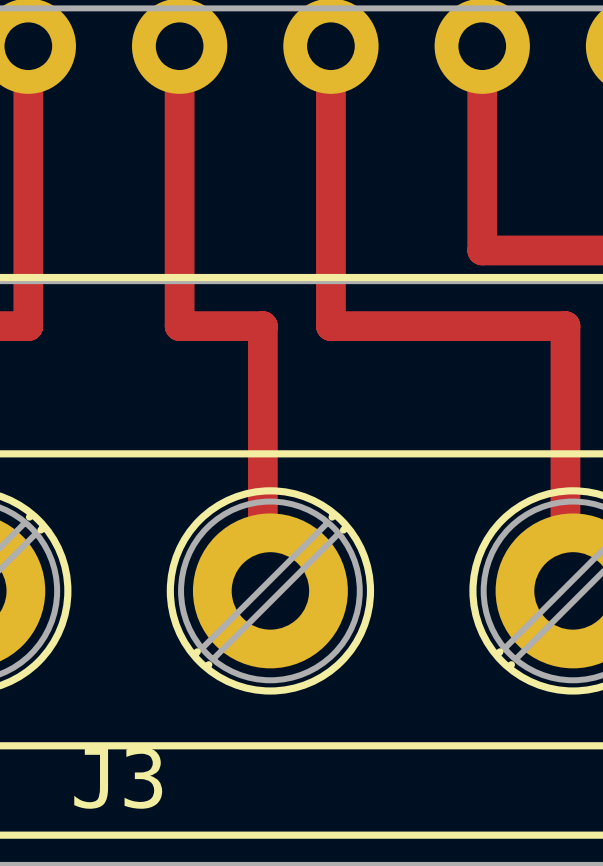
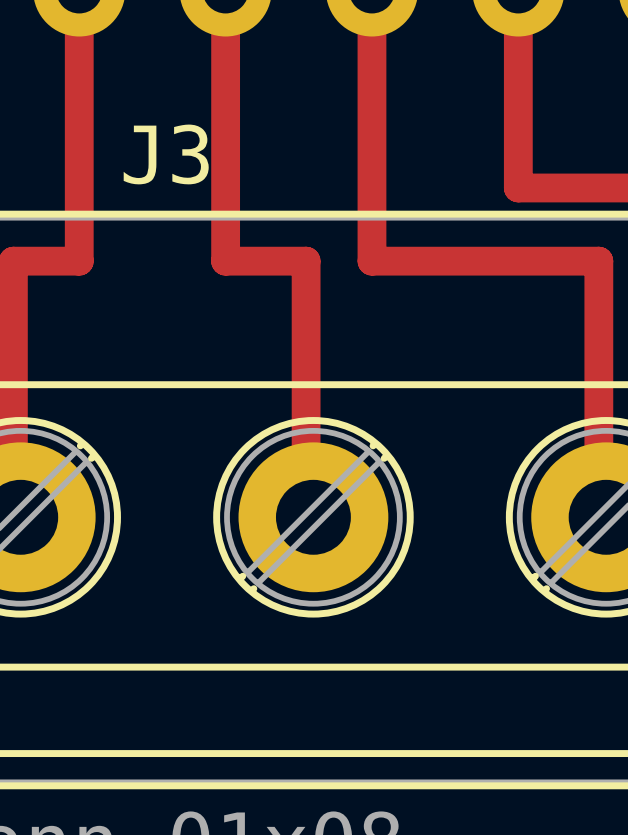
J3 name position: J3 (118, 777) -> J3 (166, 154)

